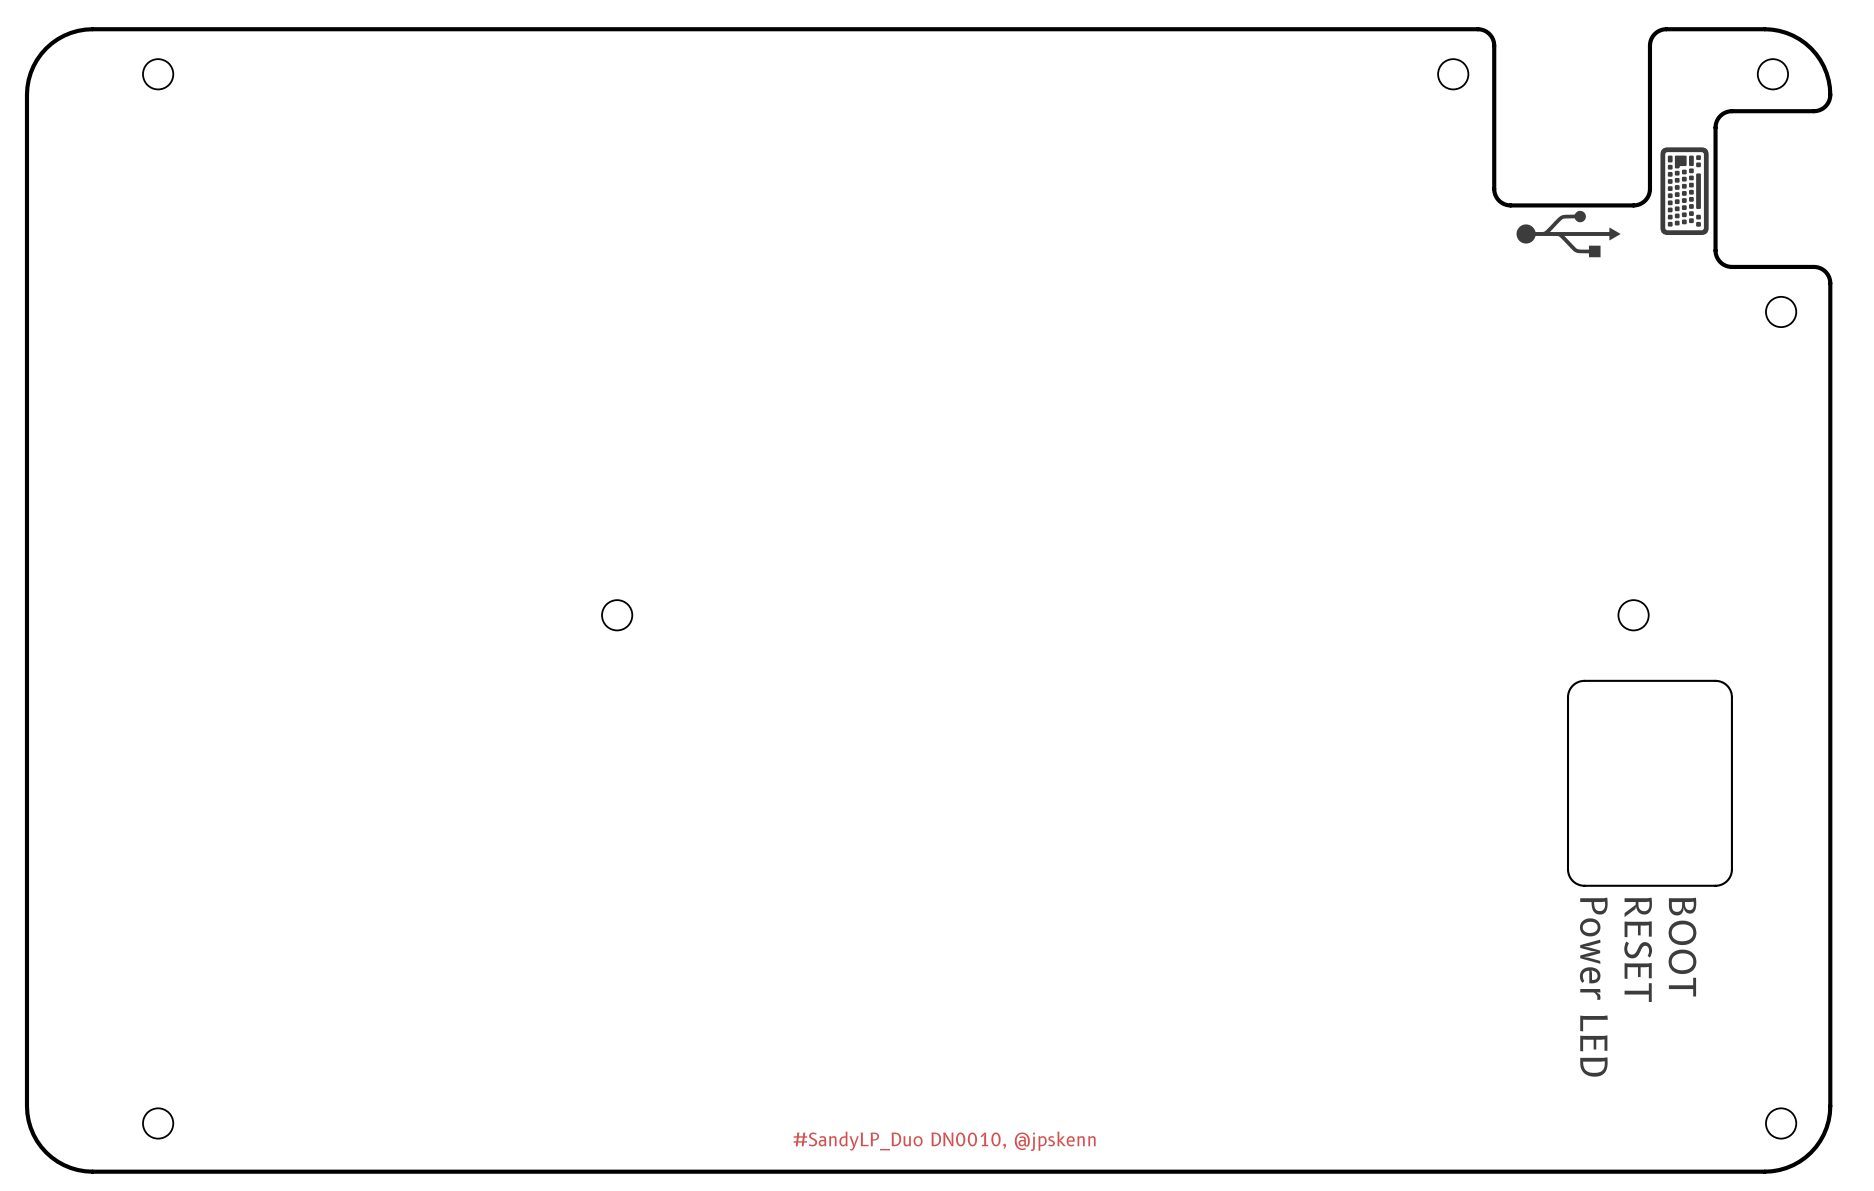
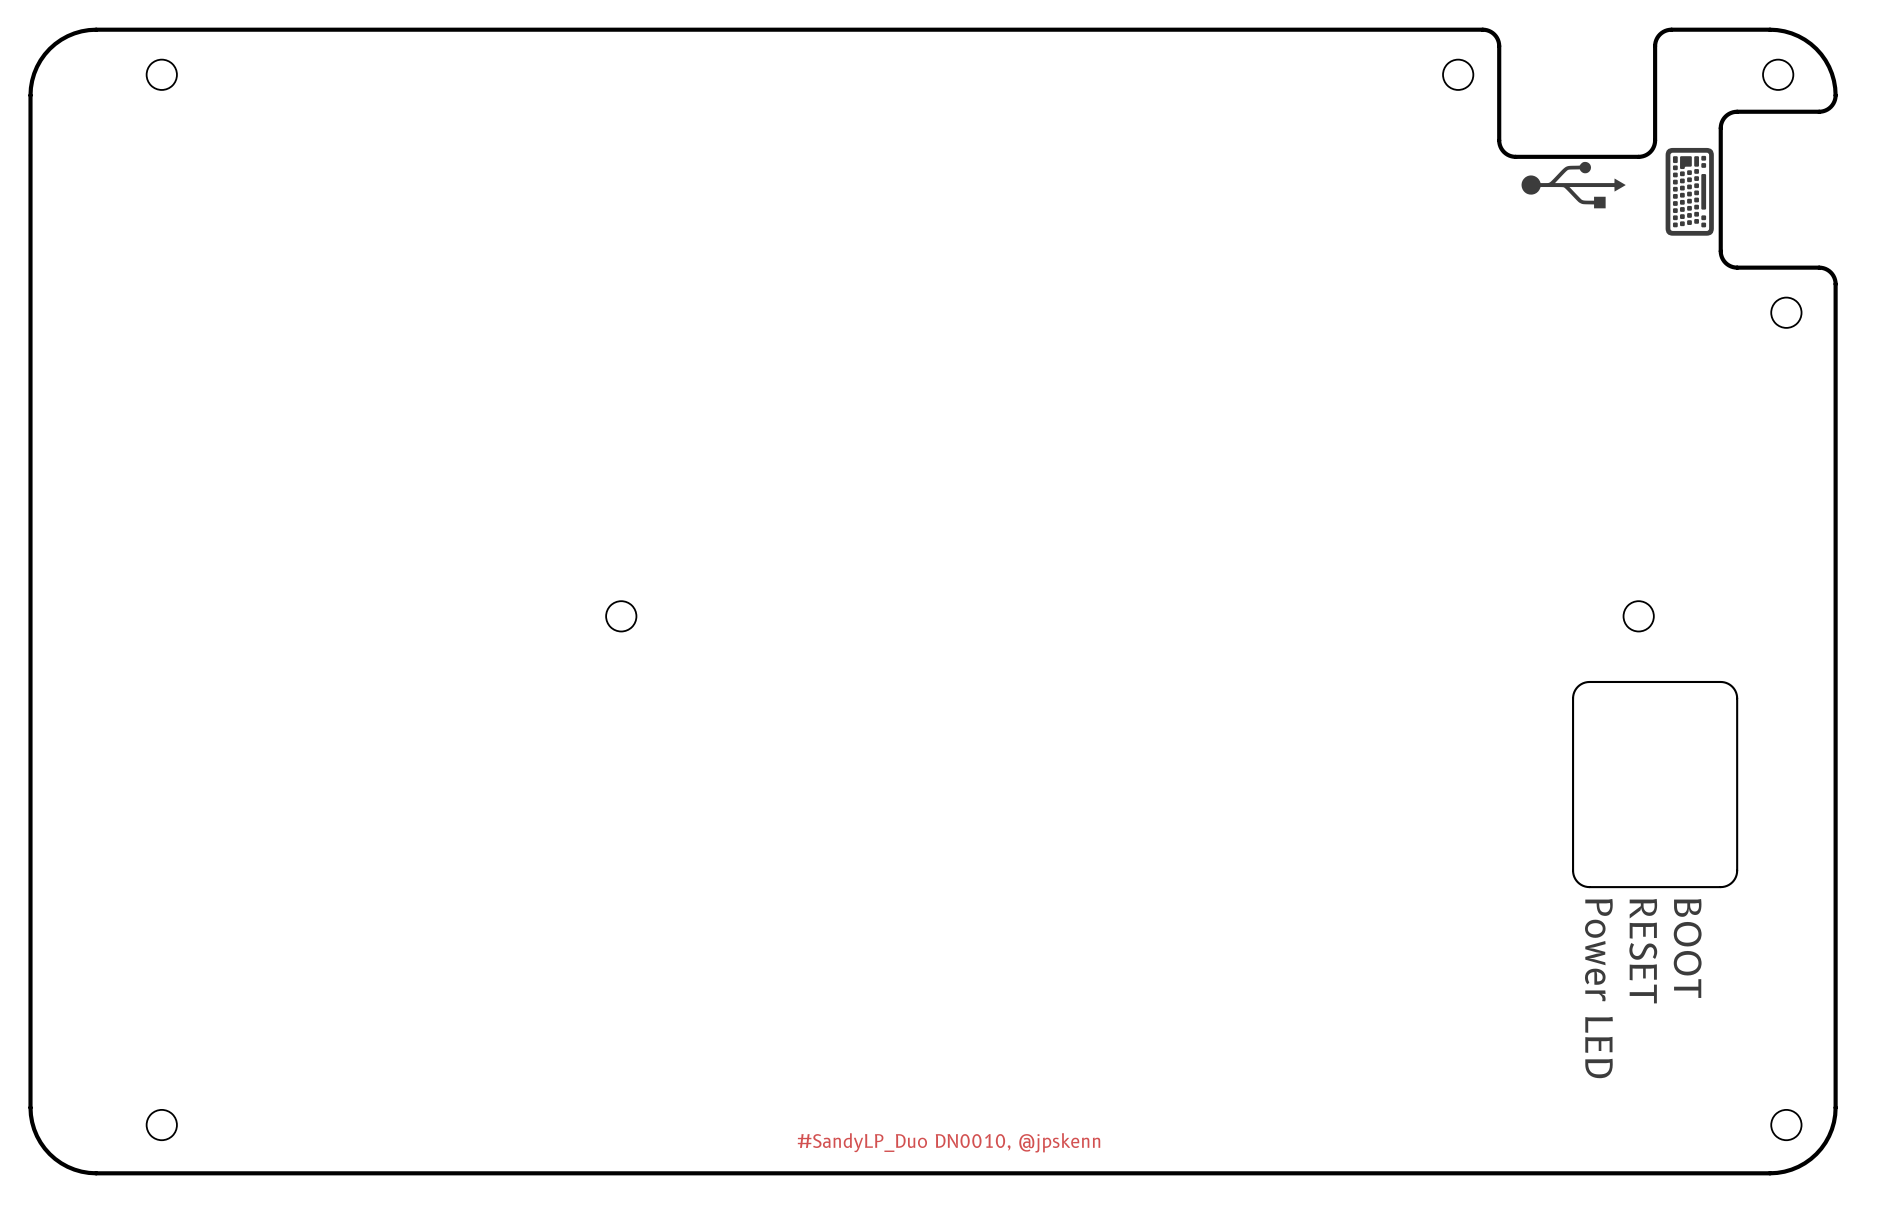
drawing shape: [24, 27, 1833, 1174] -> [28, 27, 1838, 1176]
drawing position: (1568, 234) -> (1573, 185)

